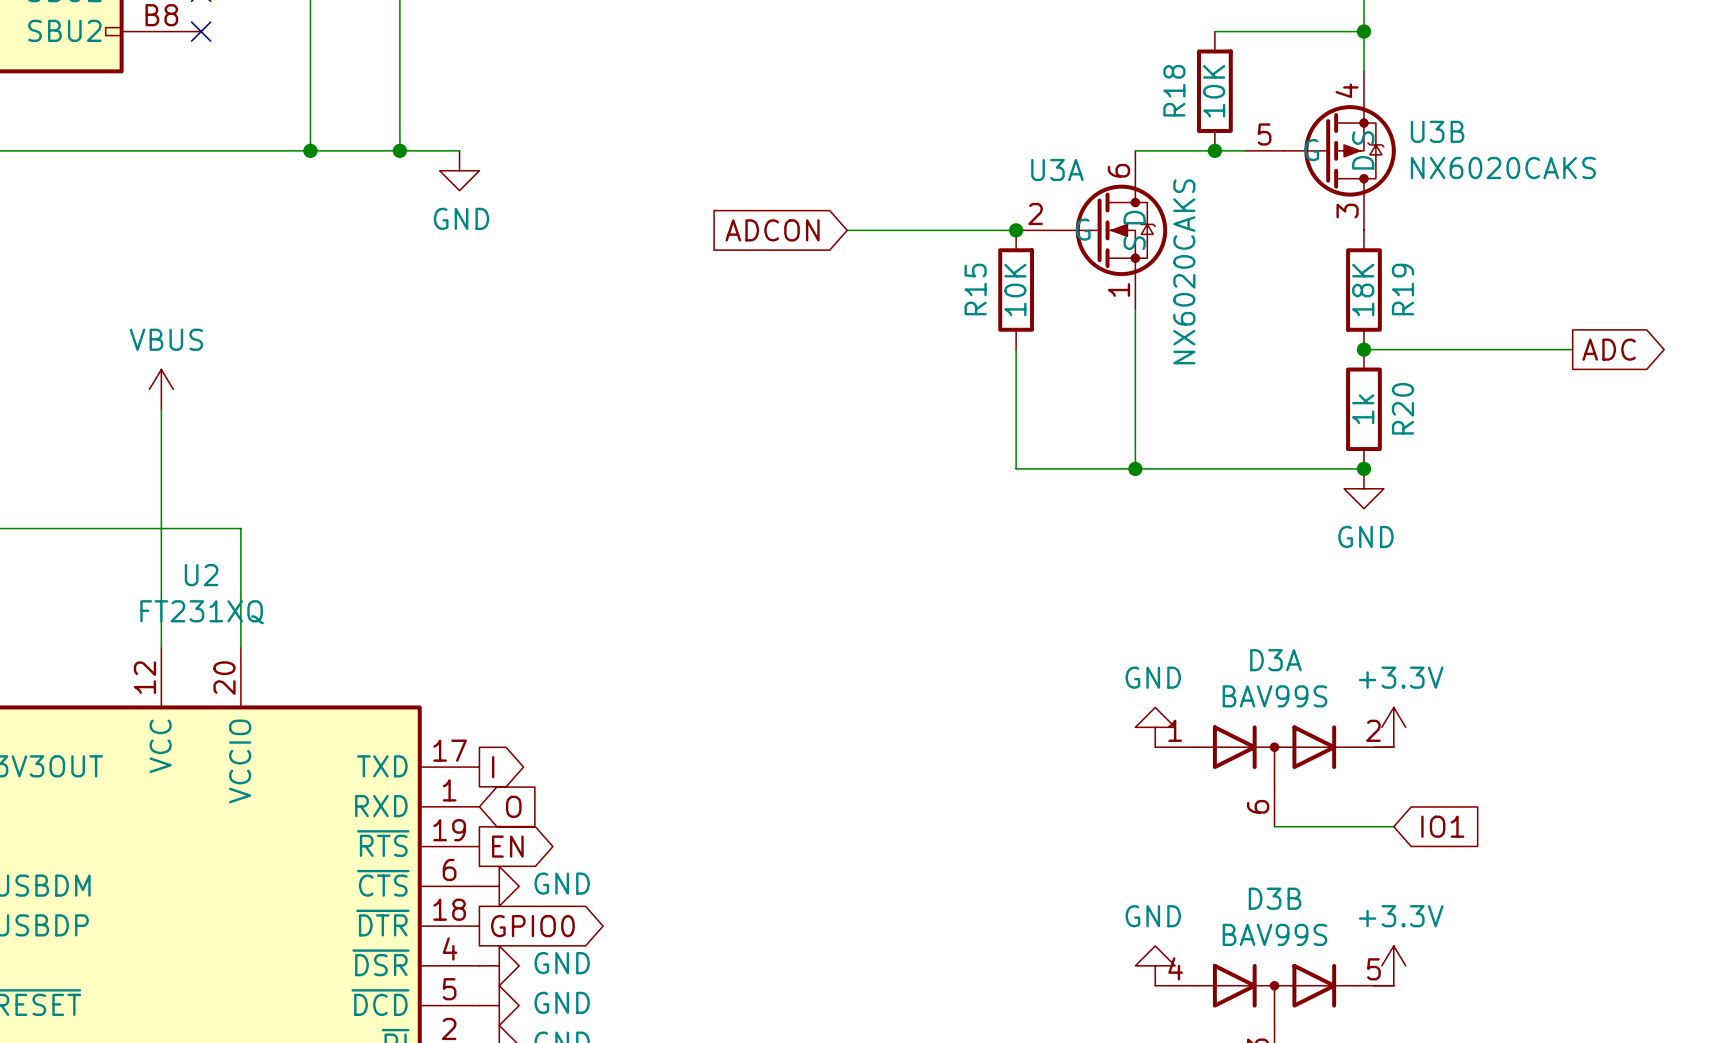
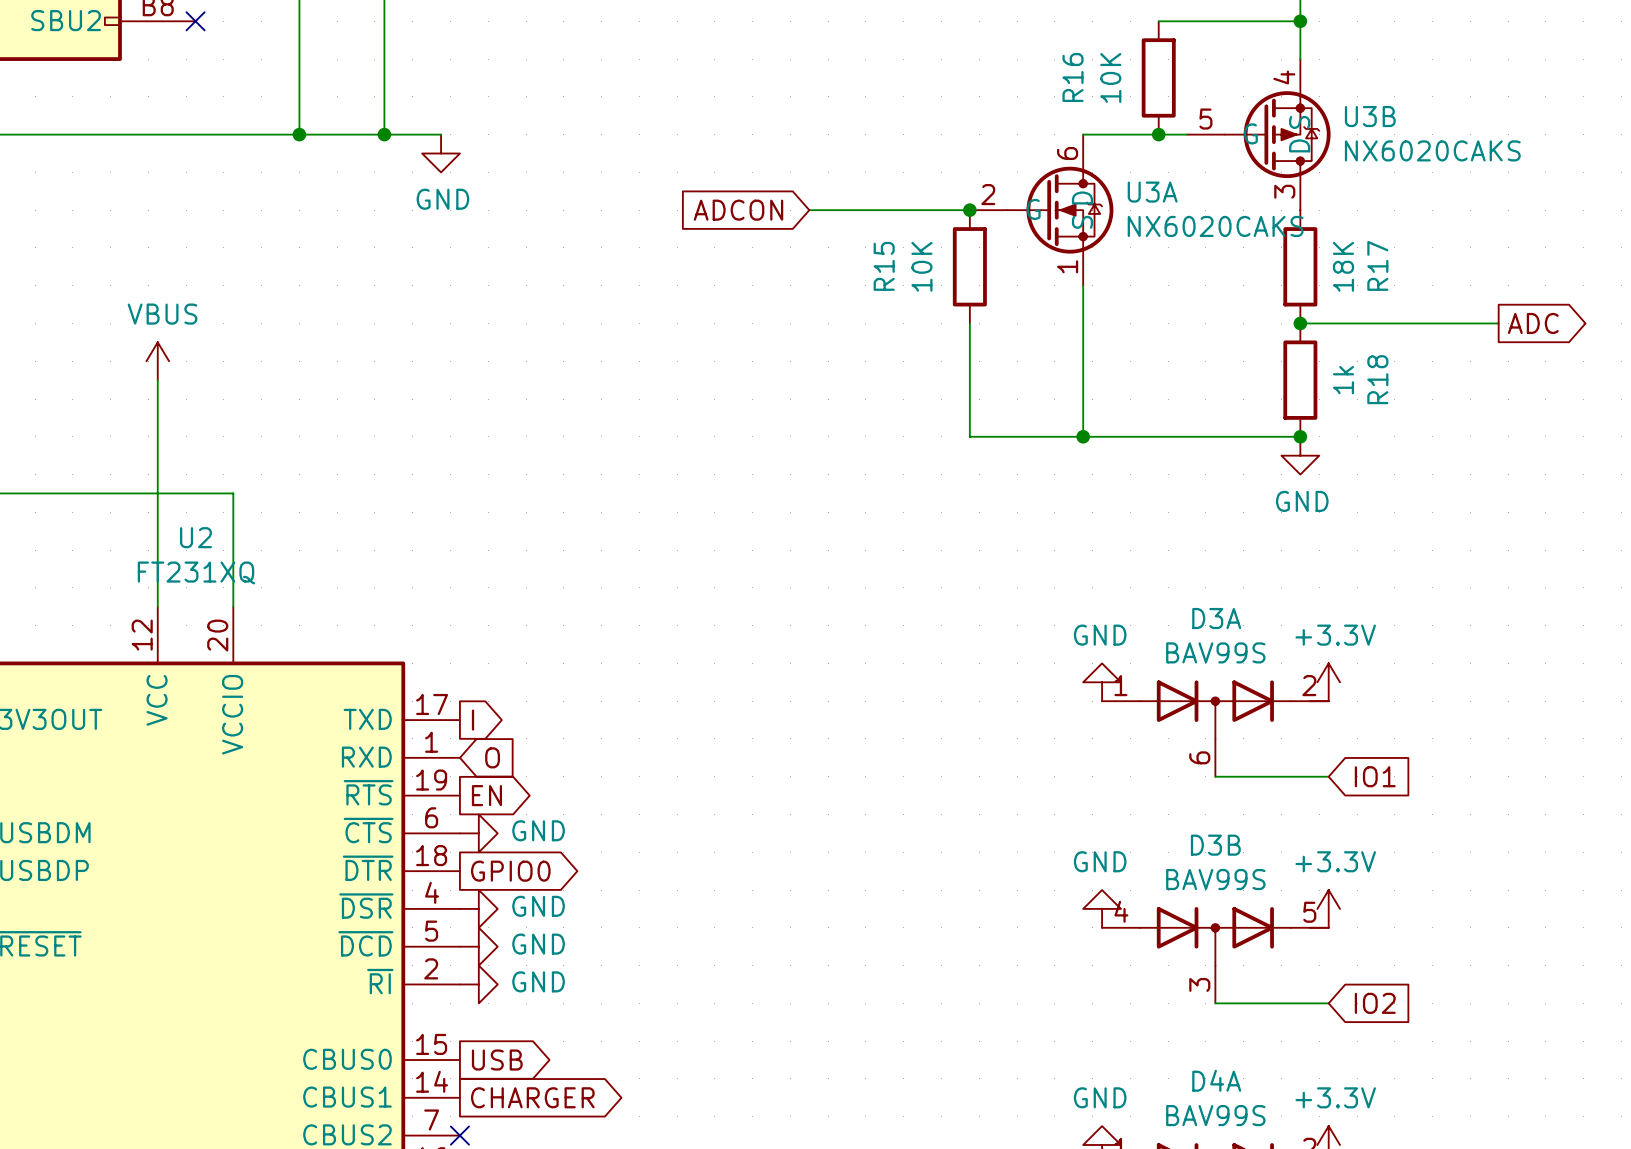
R18 name: R18 (1174, 90) -> R16 (1073, 77)
R18 value position: 10K (1214, 91) -> 10K (1110, 77)
U3A name position: U3A (1057, 170) -> U3A (1152, 192)
U3A value rotation: 0° (1184, 271) -> 90° clockwise (1215, 226)
R15 name position: R15 (975, 289) -> R15 (884, 266)
R19 name: R19 (1402, 289) -> R17 (1377, 265)
R15 value position: 10K (1015, 290) -> 10K (921, 266)
R19 value position: 18K (1363, 290) -> 18K (1343, 266)
R20 name: R20 (1402, 408) -> R18 (1377, 379)
R20 value position: 1k (1363, 409) -> 1k (1343, 380)

